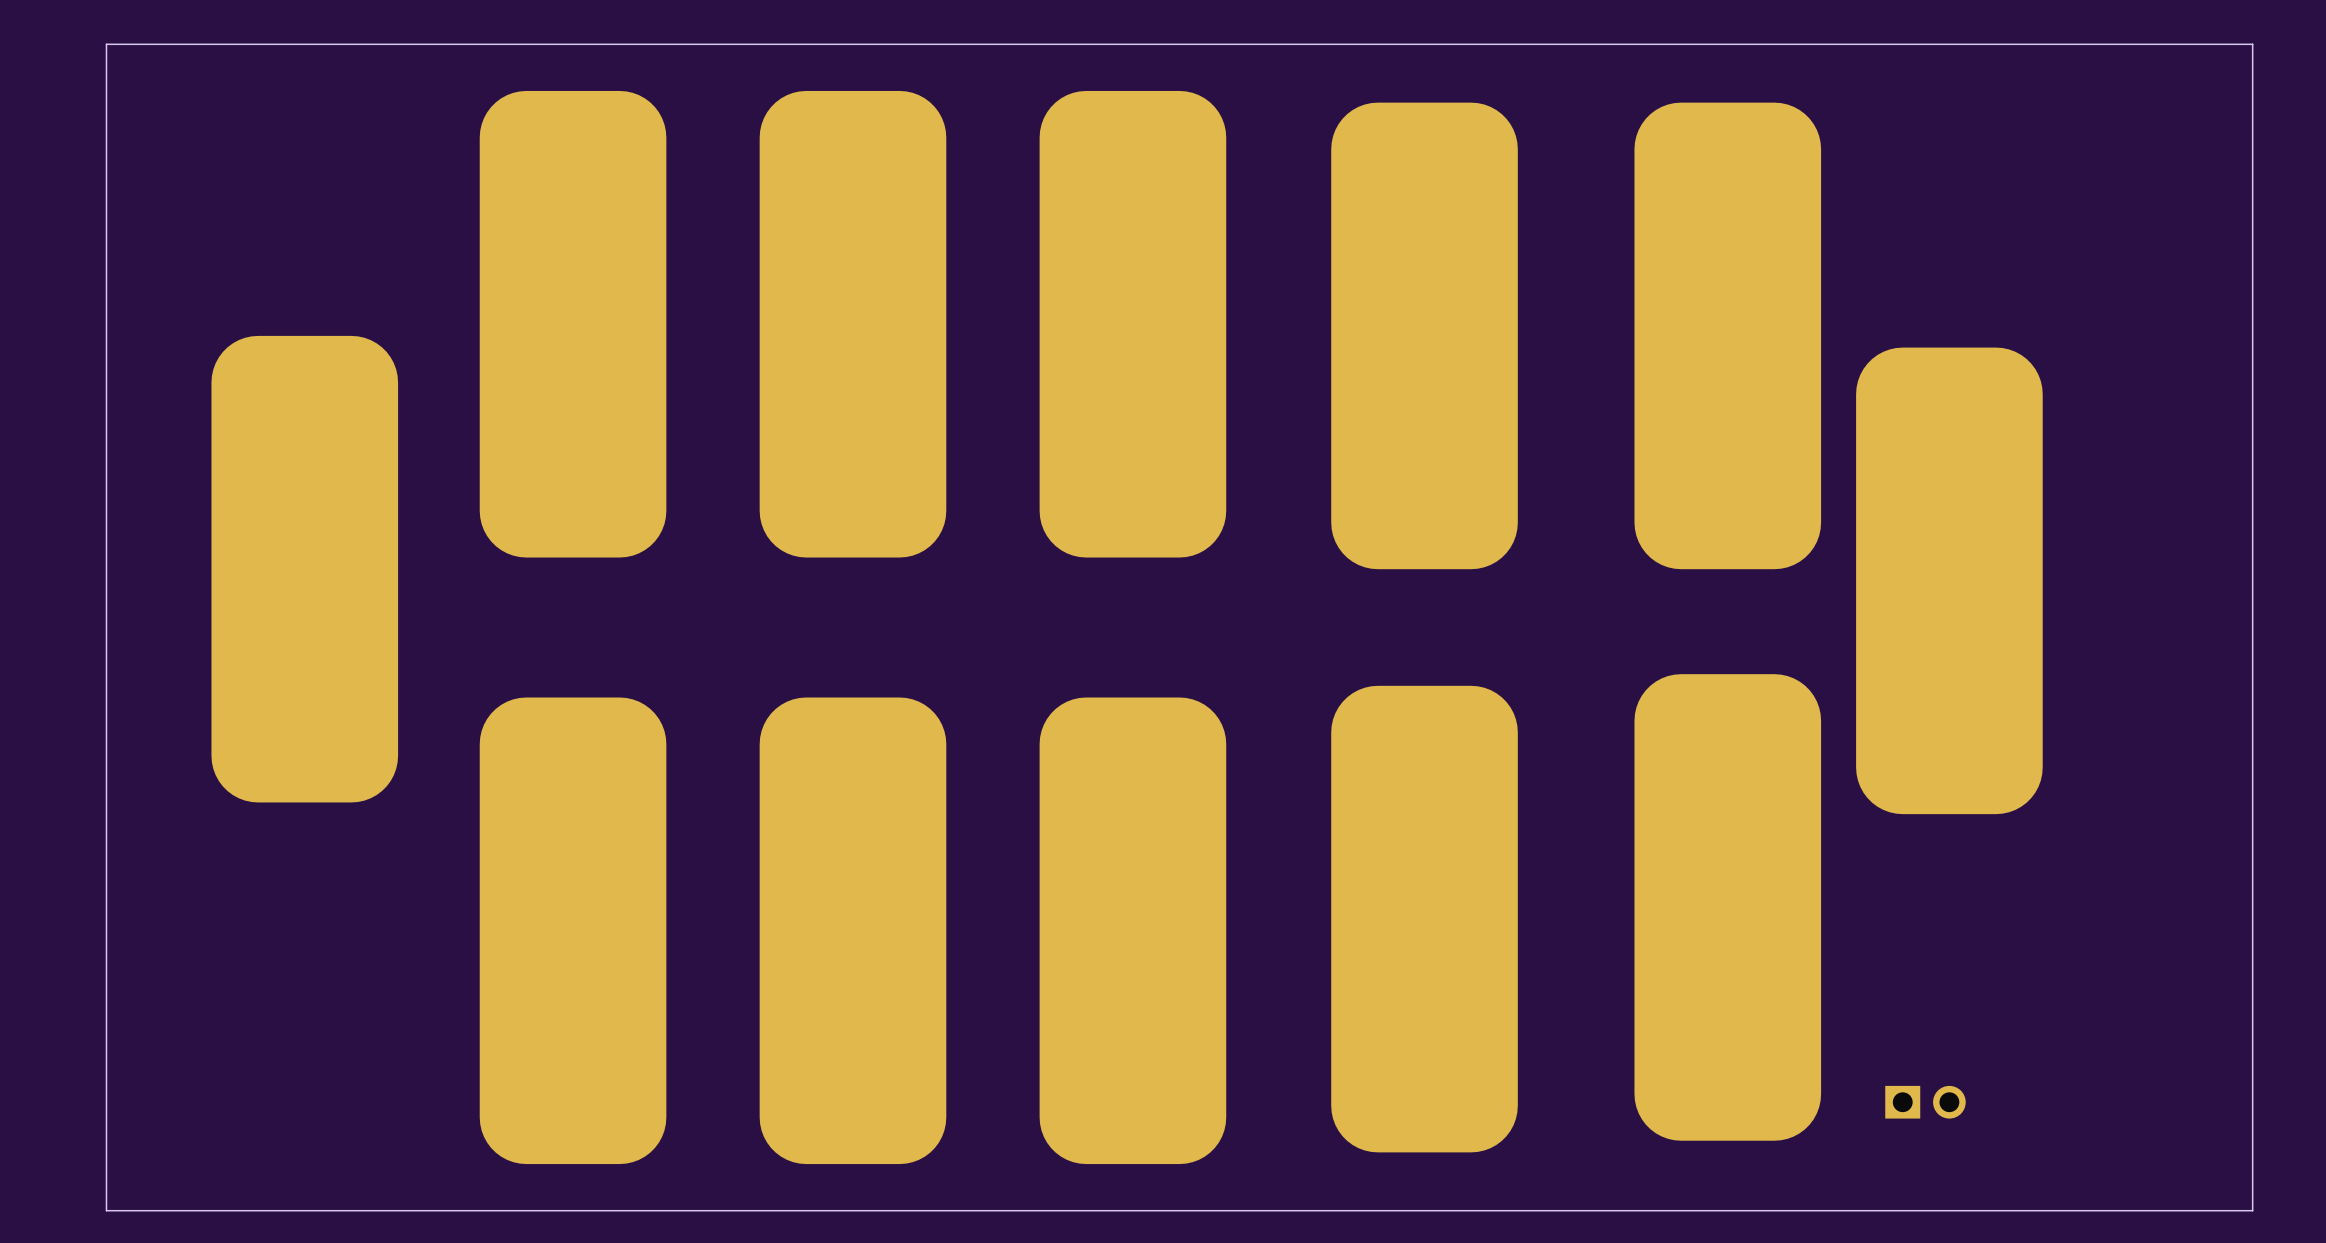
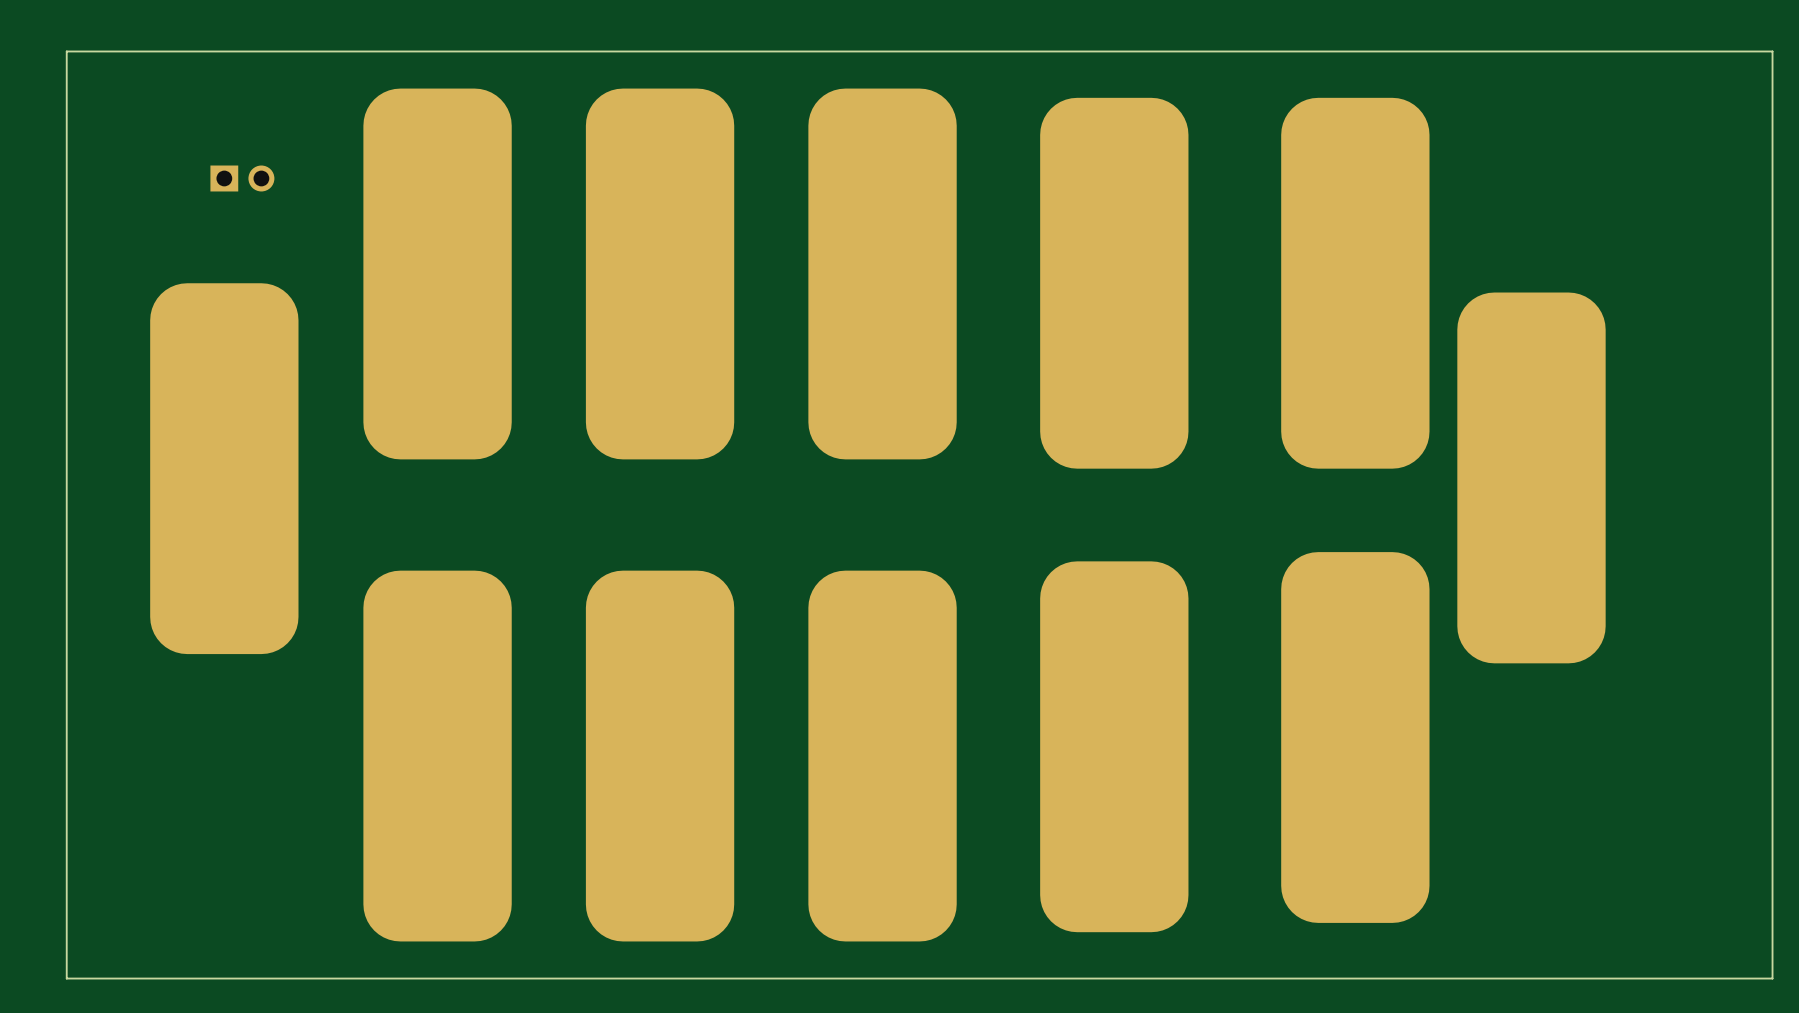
part: none -> (242, 178)
part: (1925, 1102) -> none

